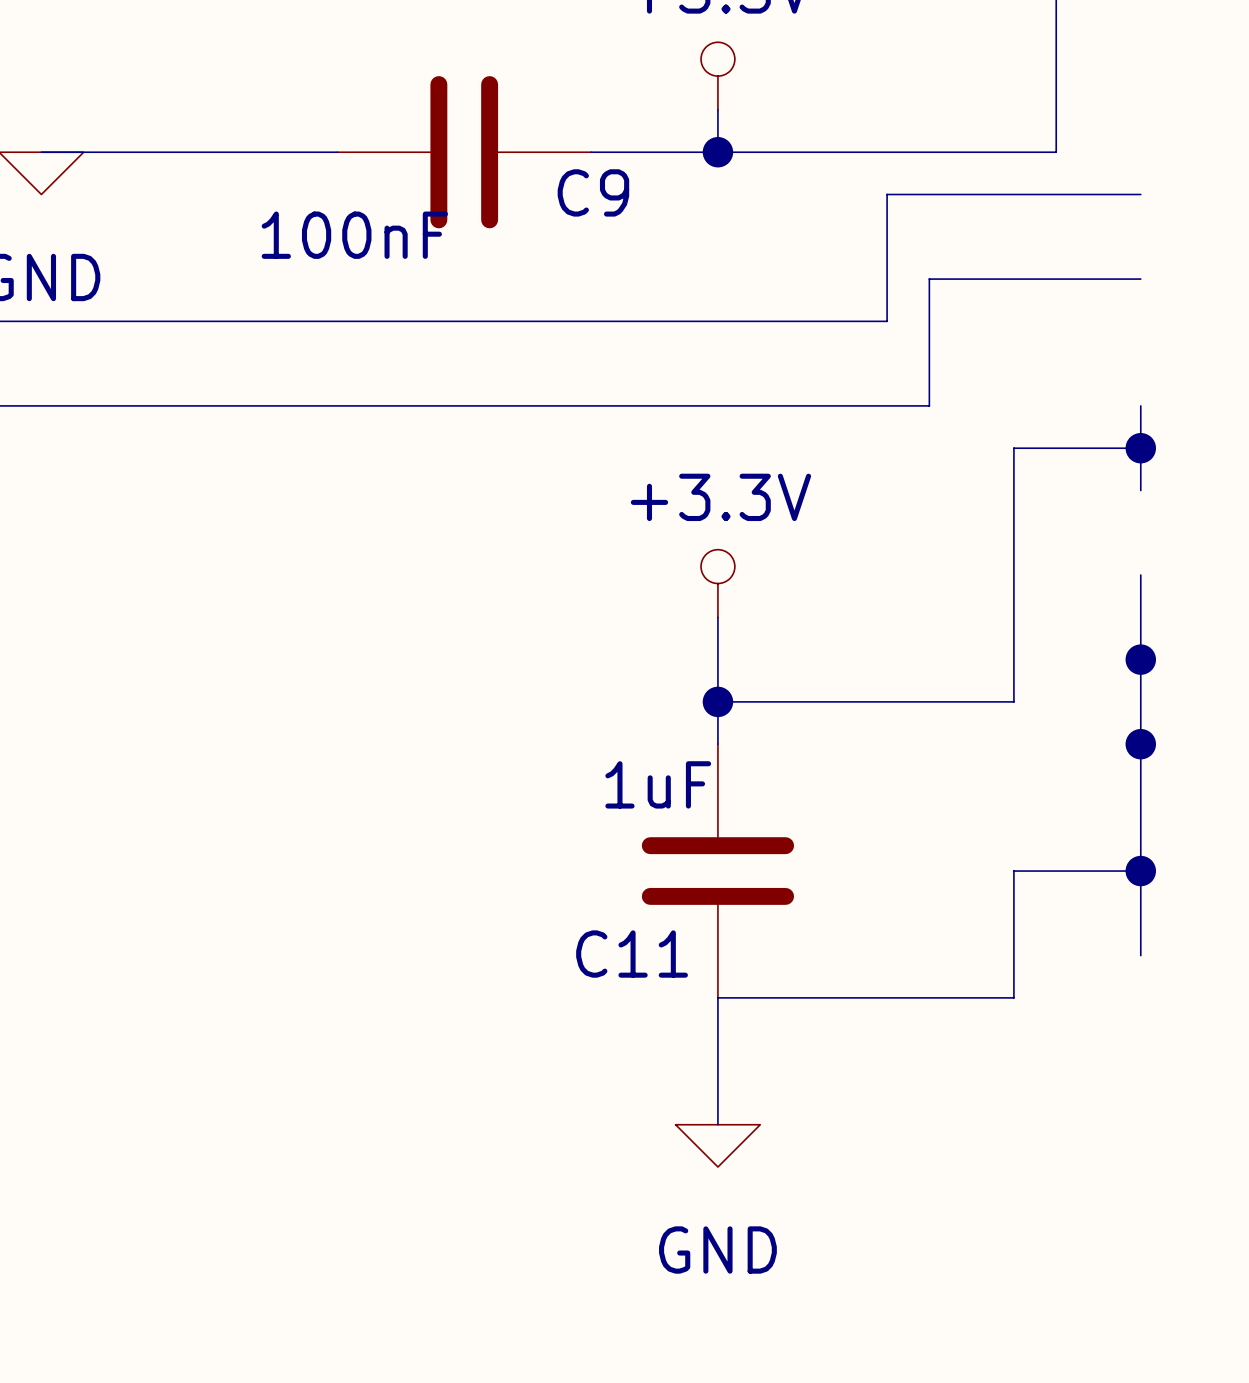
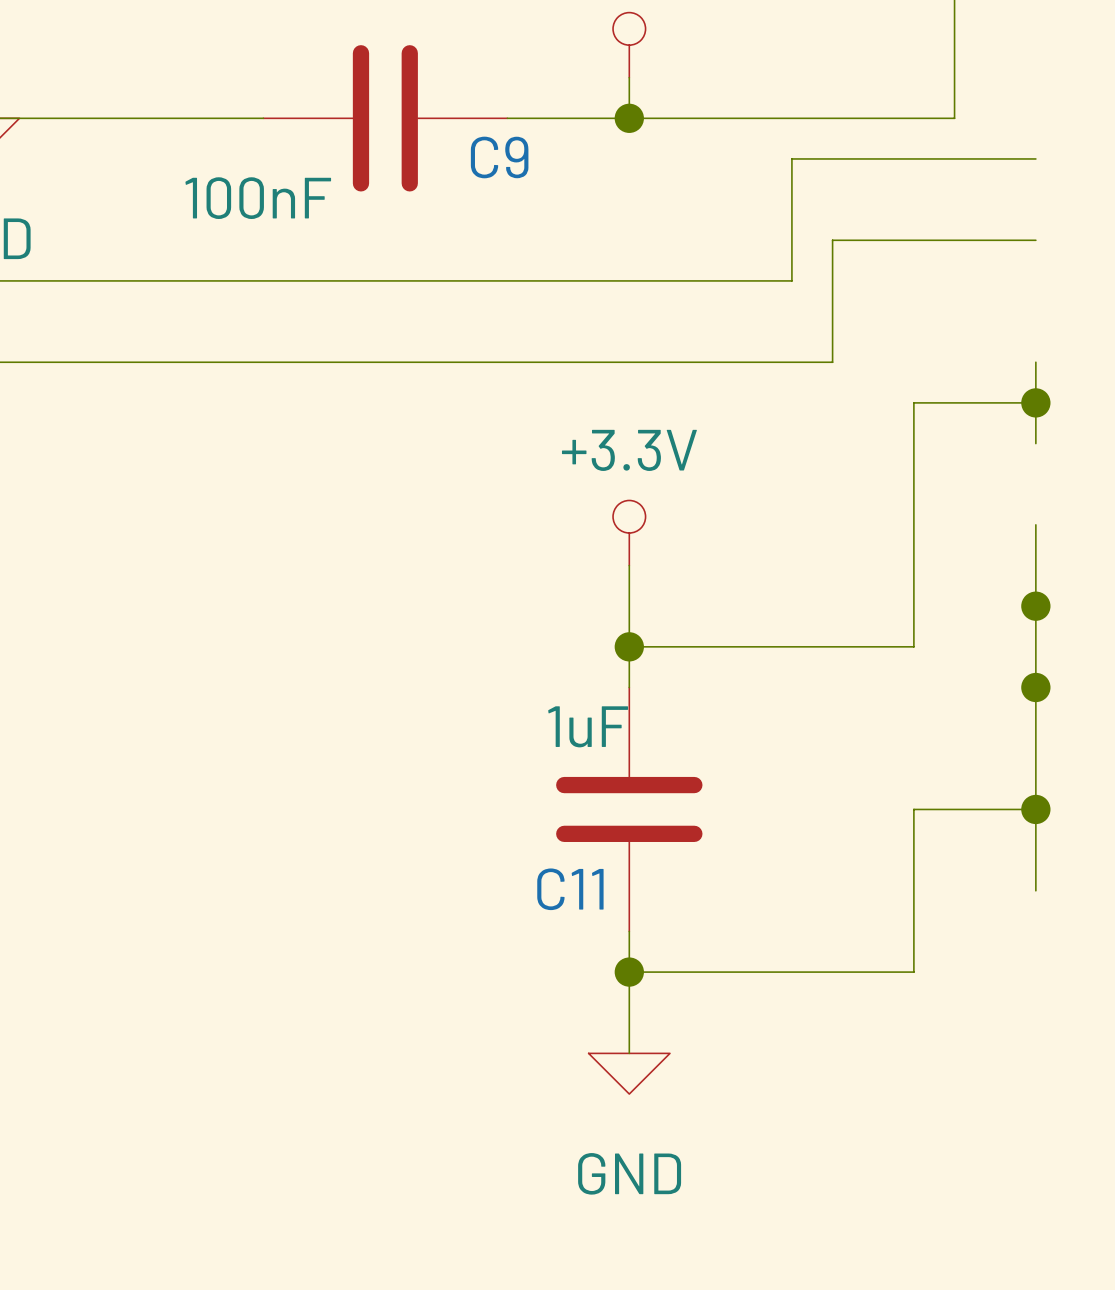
wire: (717, 997) (1013, 997) -> (629, 972) (913, 972) (913, 931)
junction: none -> (629, 972)

